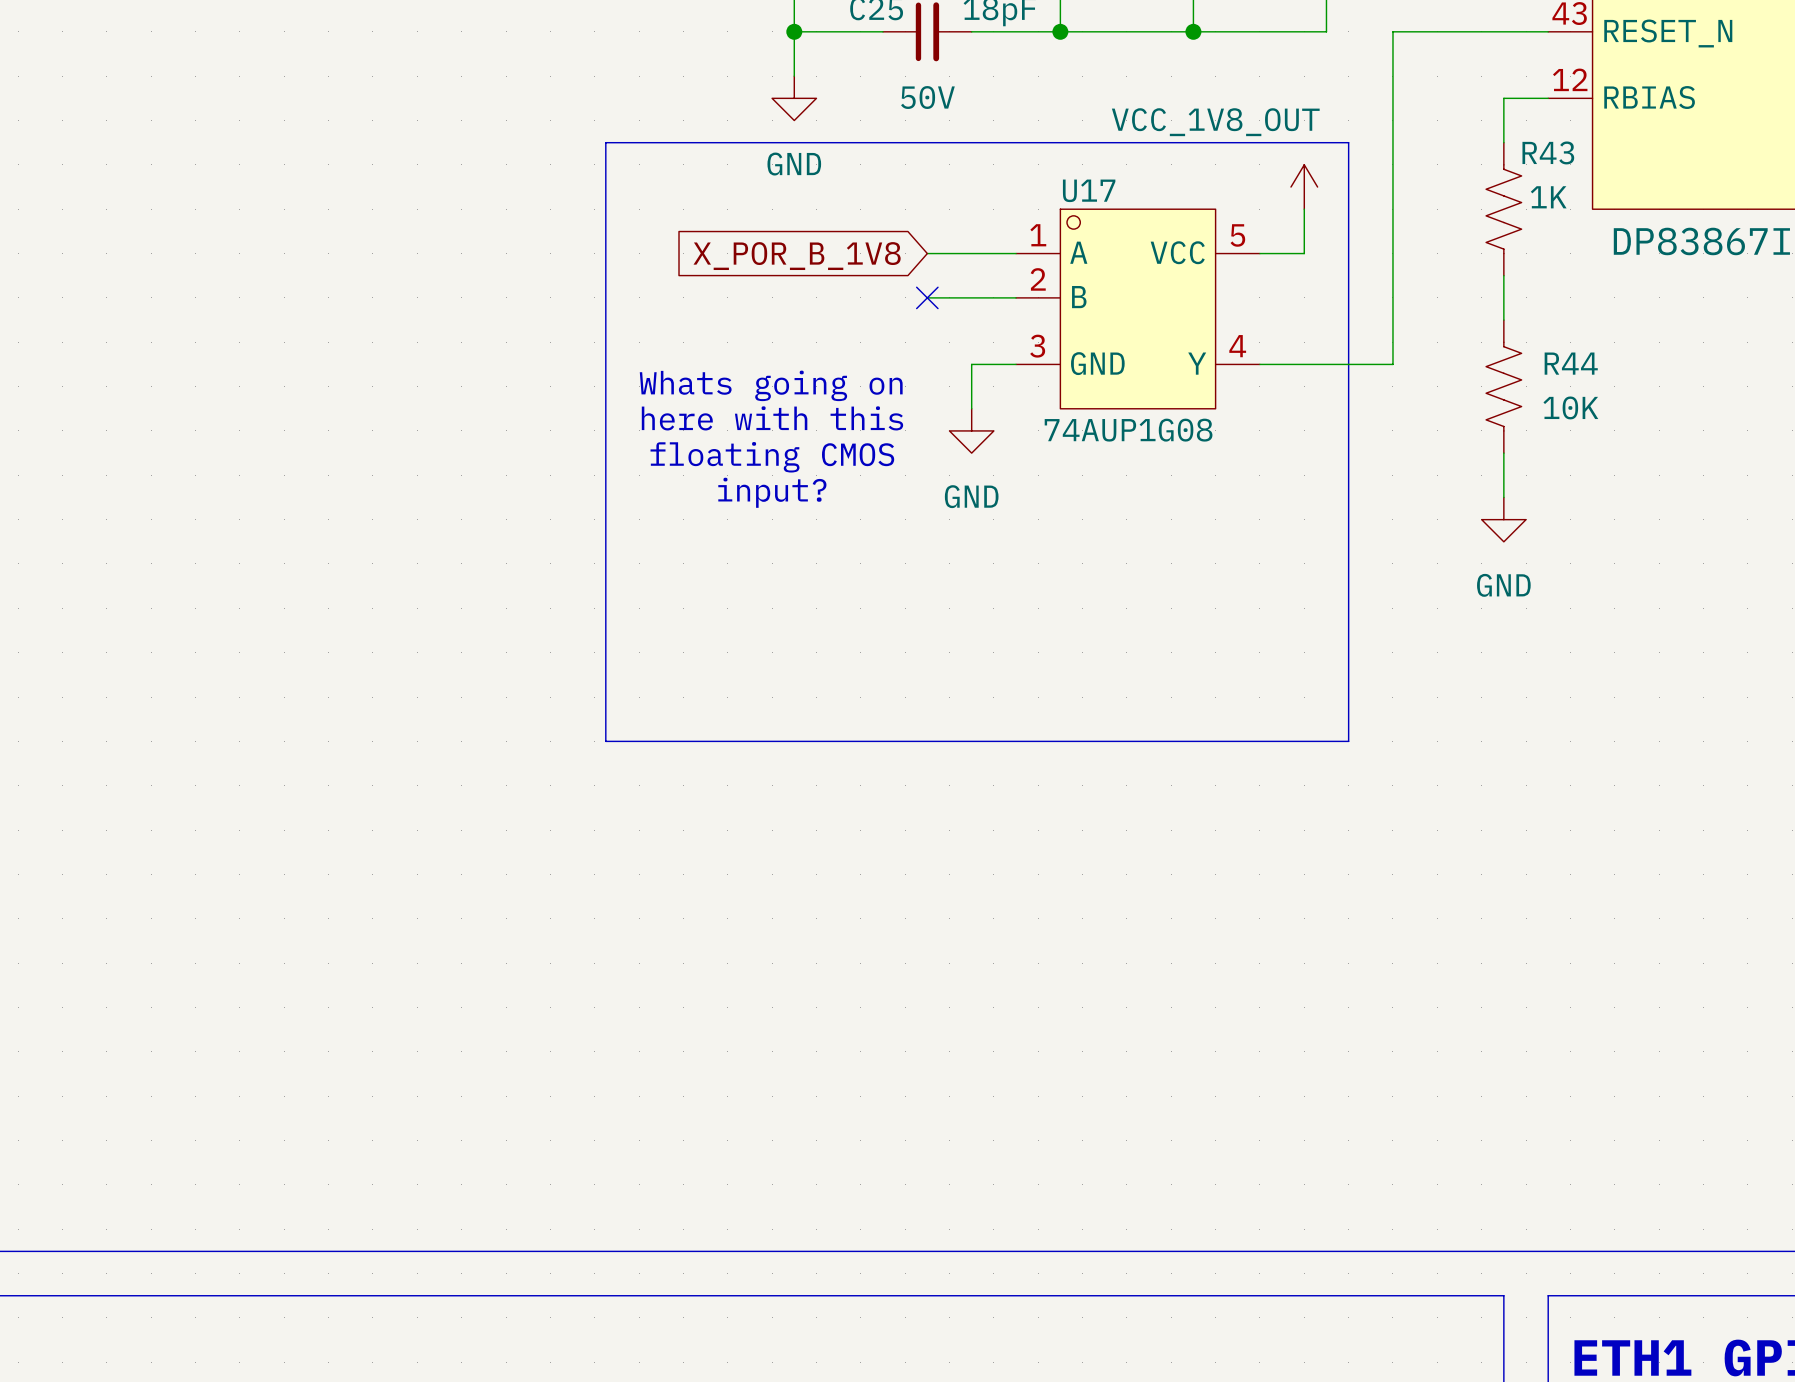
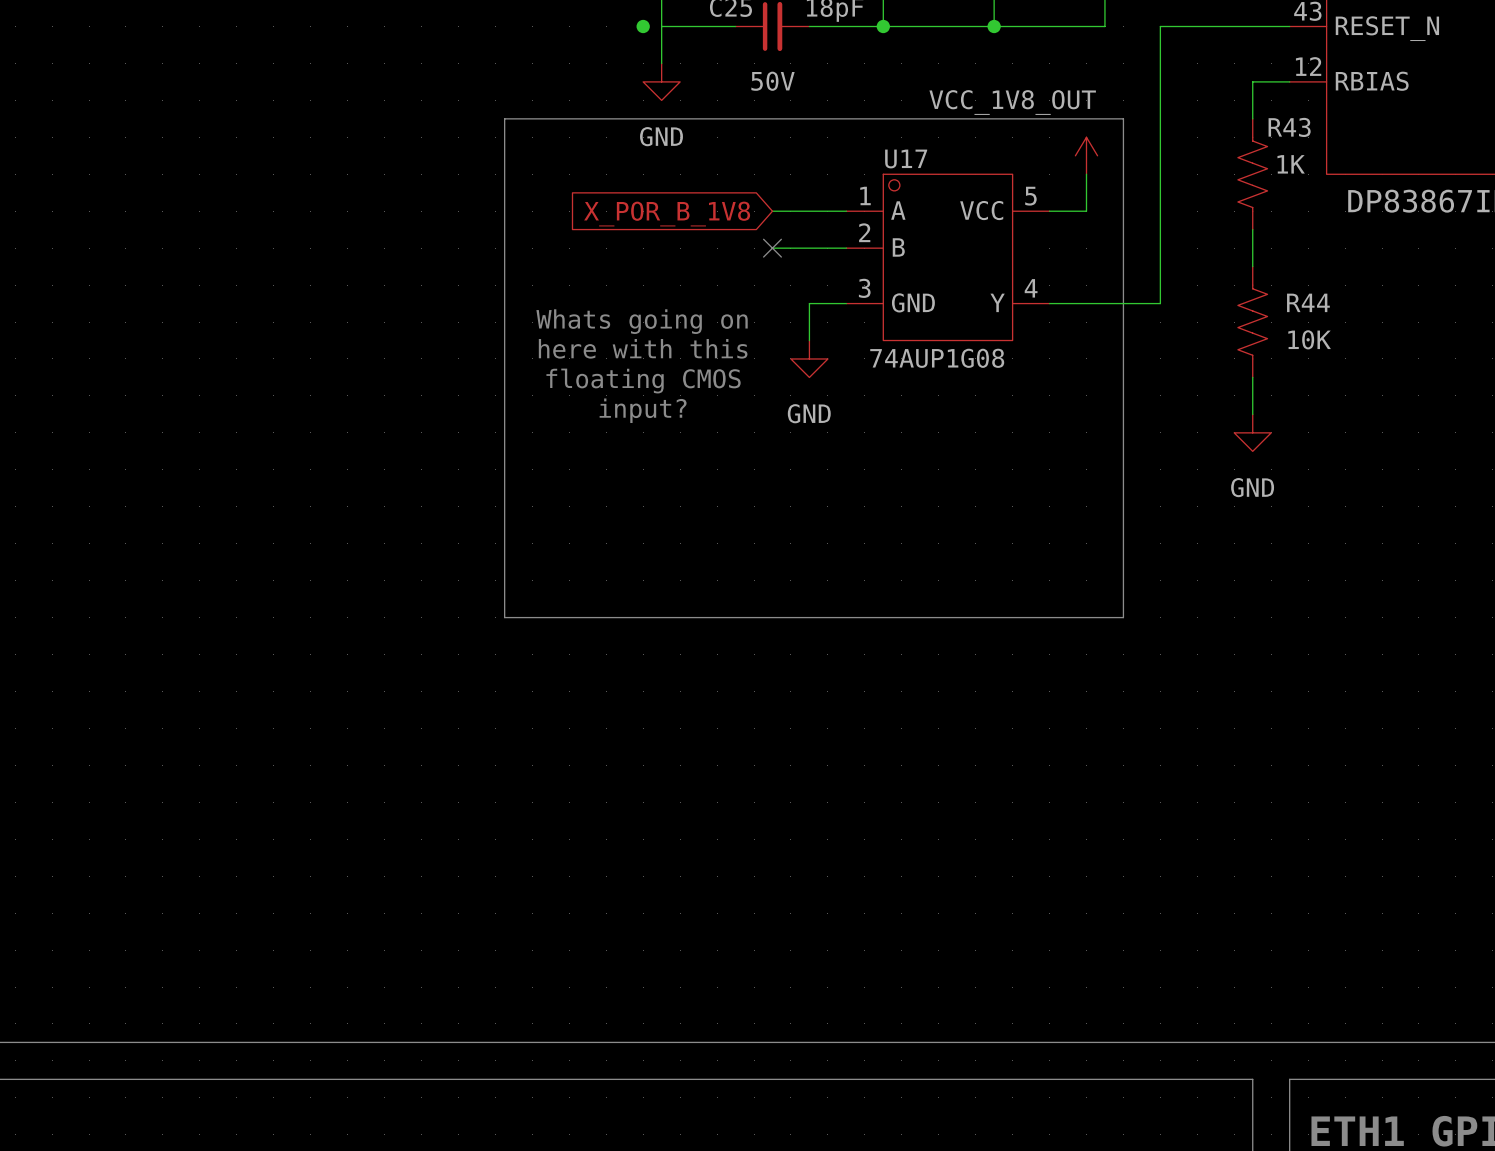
junction position: (794, 31) -> (643, 26)

